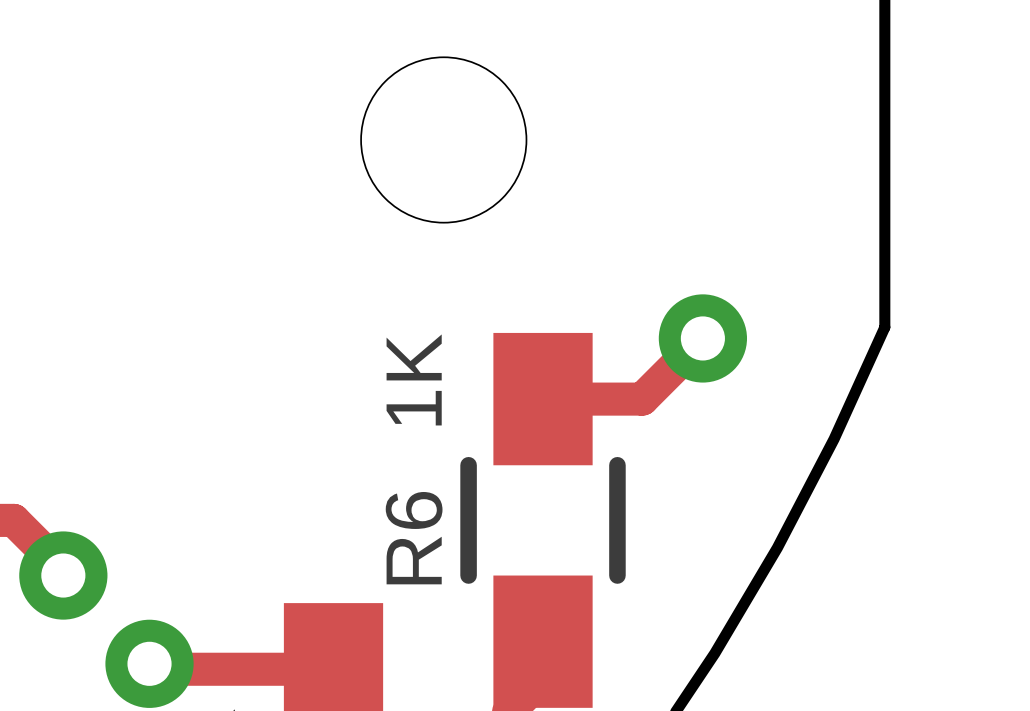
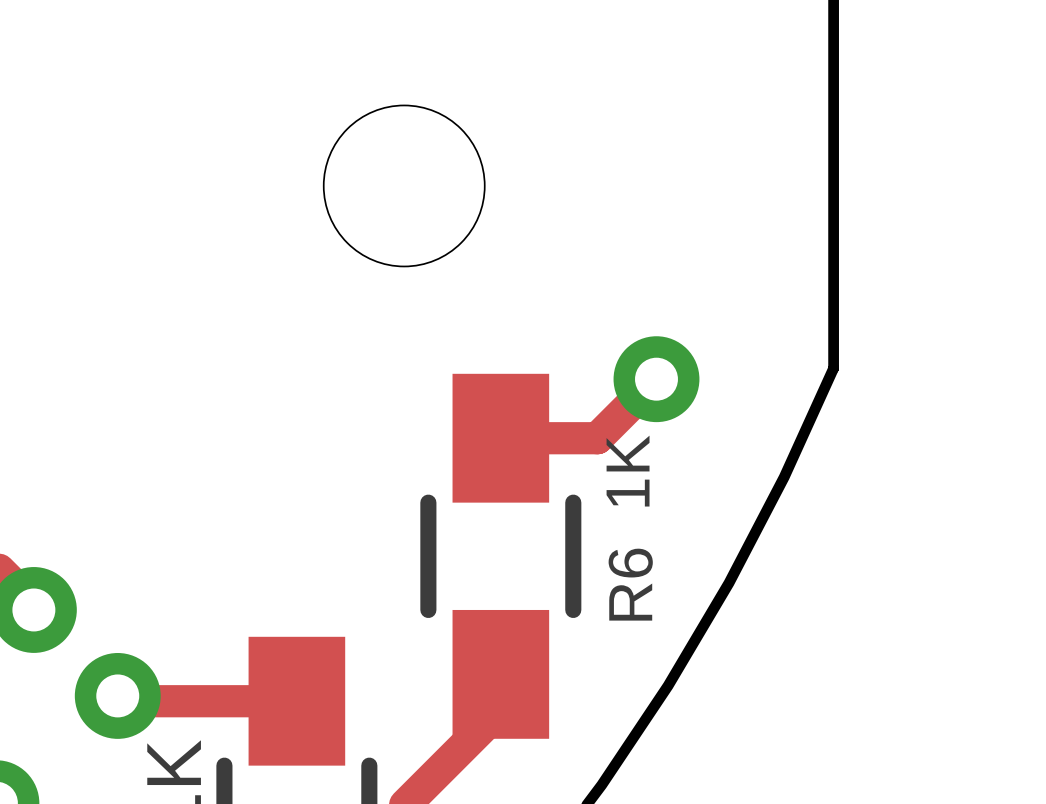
R6 value position: 1K (414, 379) -> 1K (628, 471)
R6 name position: R6 (414, 538) -> R6 (630, 584)

